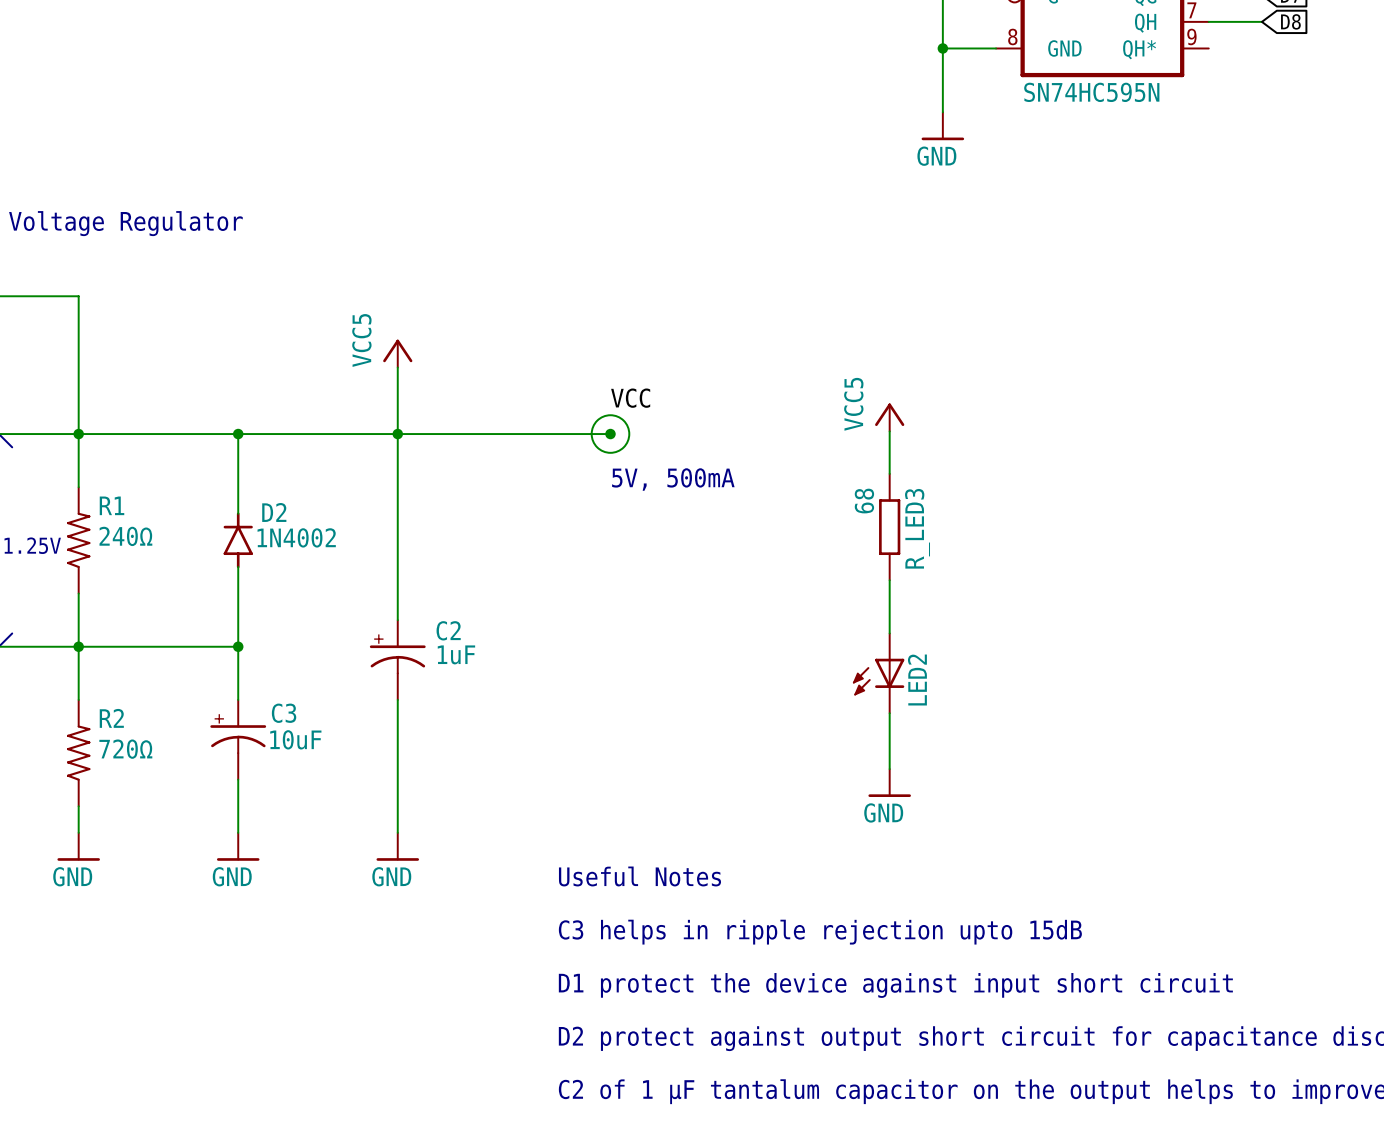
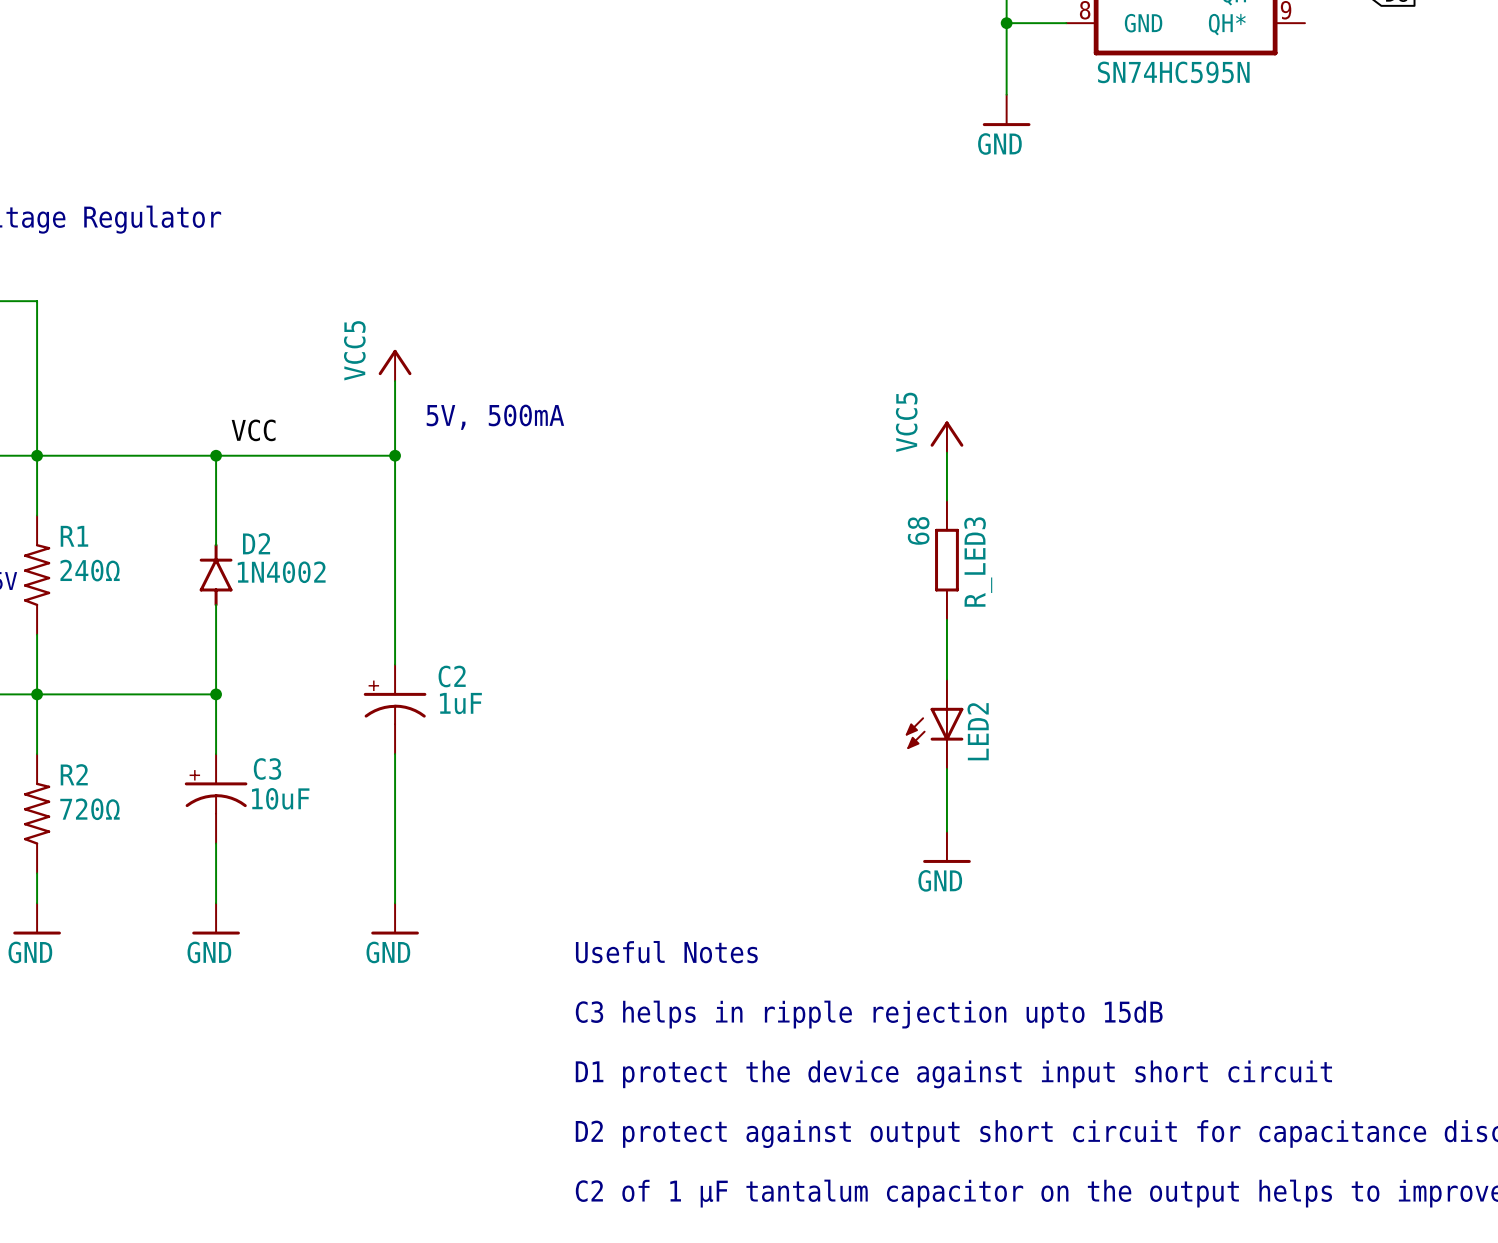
label: VCC (630, 398) -> none
label: none -> VCC (253, 430)
drawing: [590, 414, 631, 454] -> none
wire: (397, 434) (610, 434) -> none
junction: (610, 434) -> none
text position: 5V, 500mA (673, 479) -> 5V, 500mA (495, 417)

